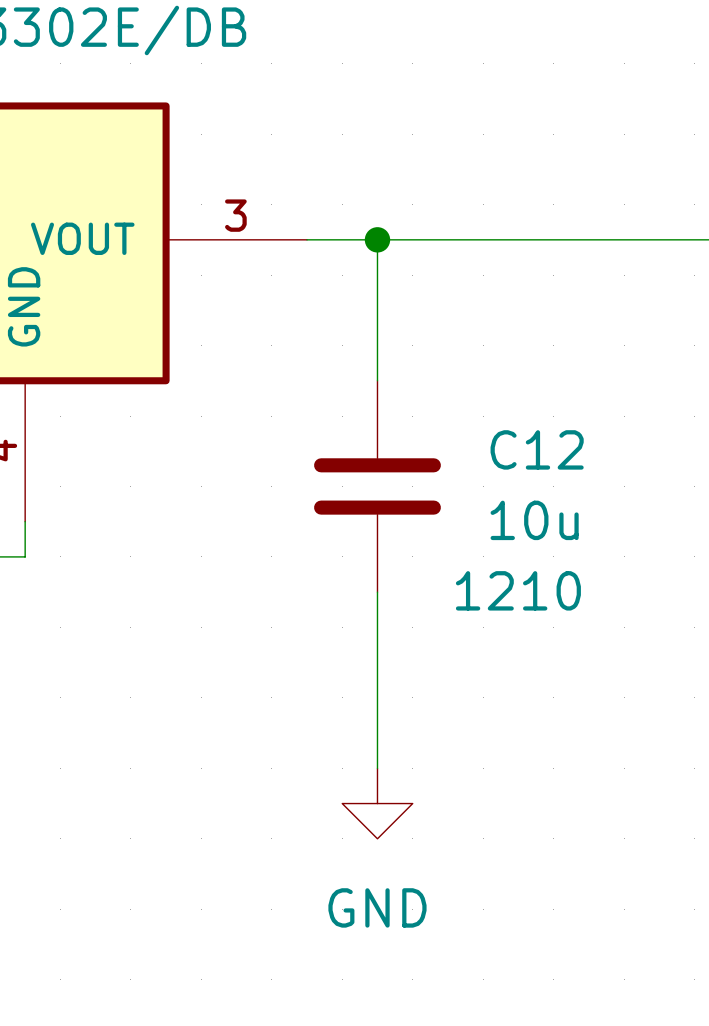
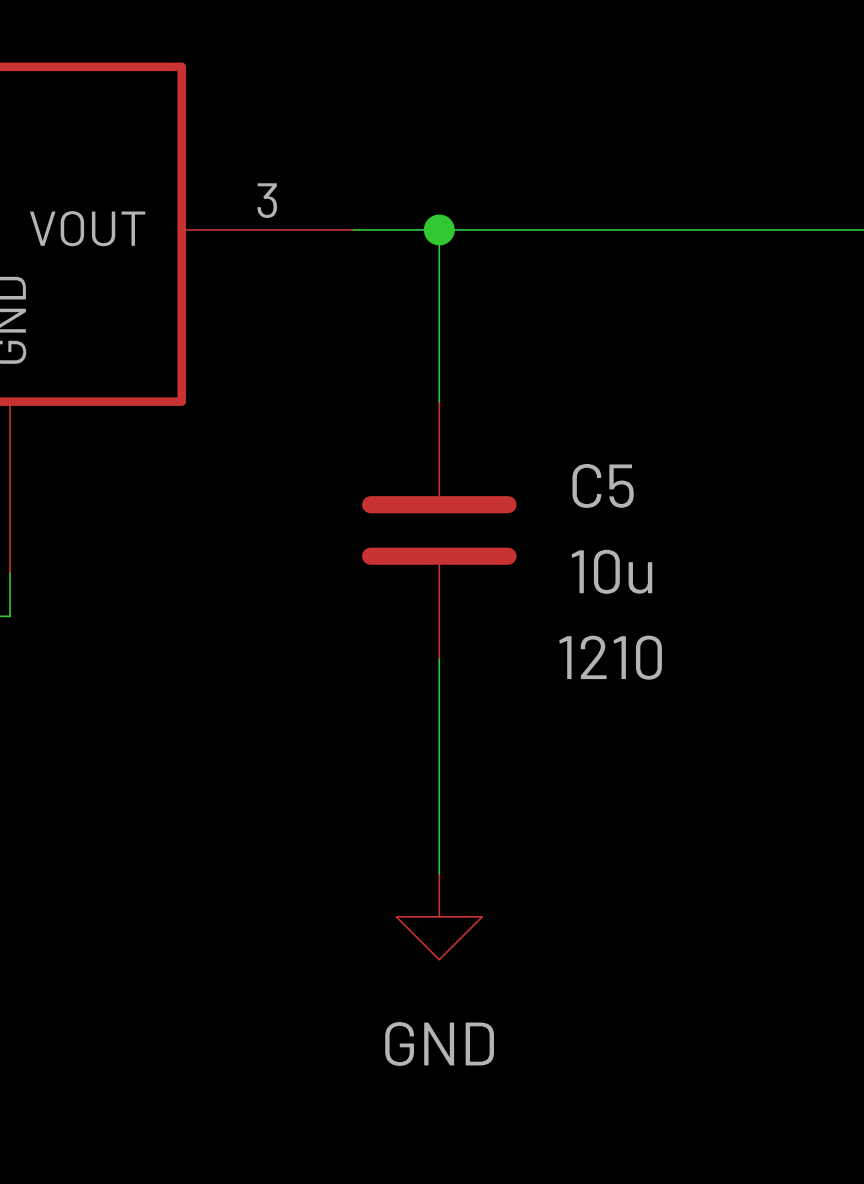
C12 name: C12 (537, 449) -> C5 (603, 485)

